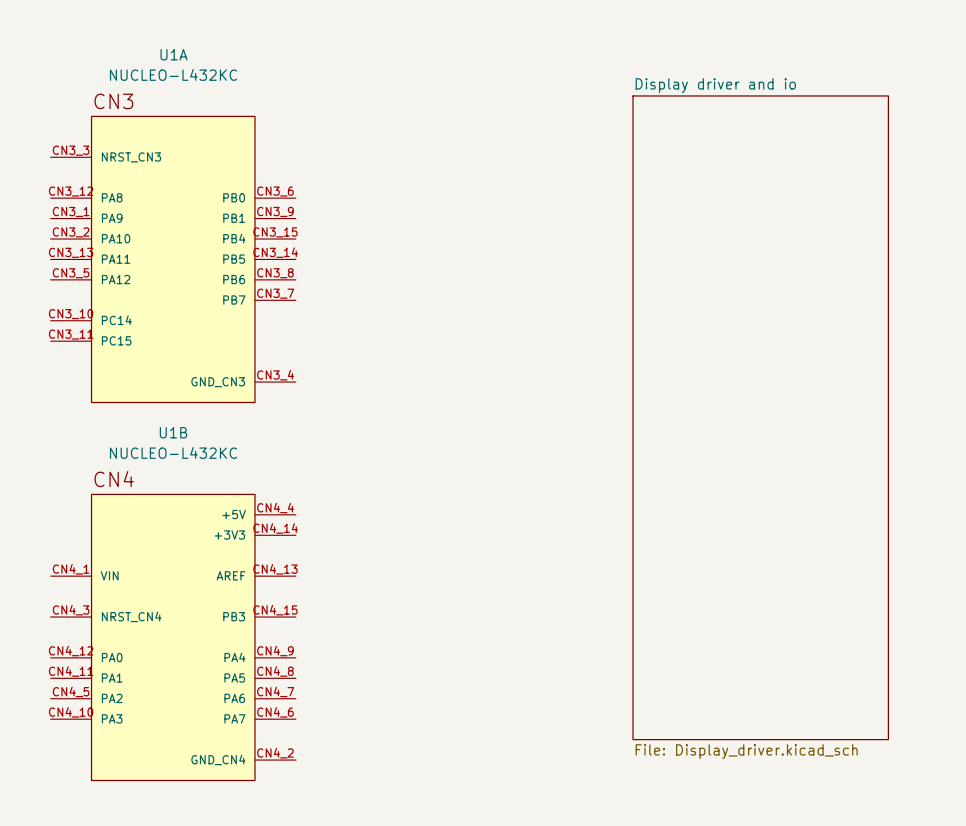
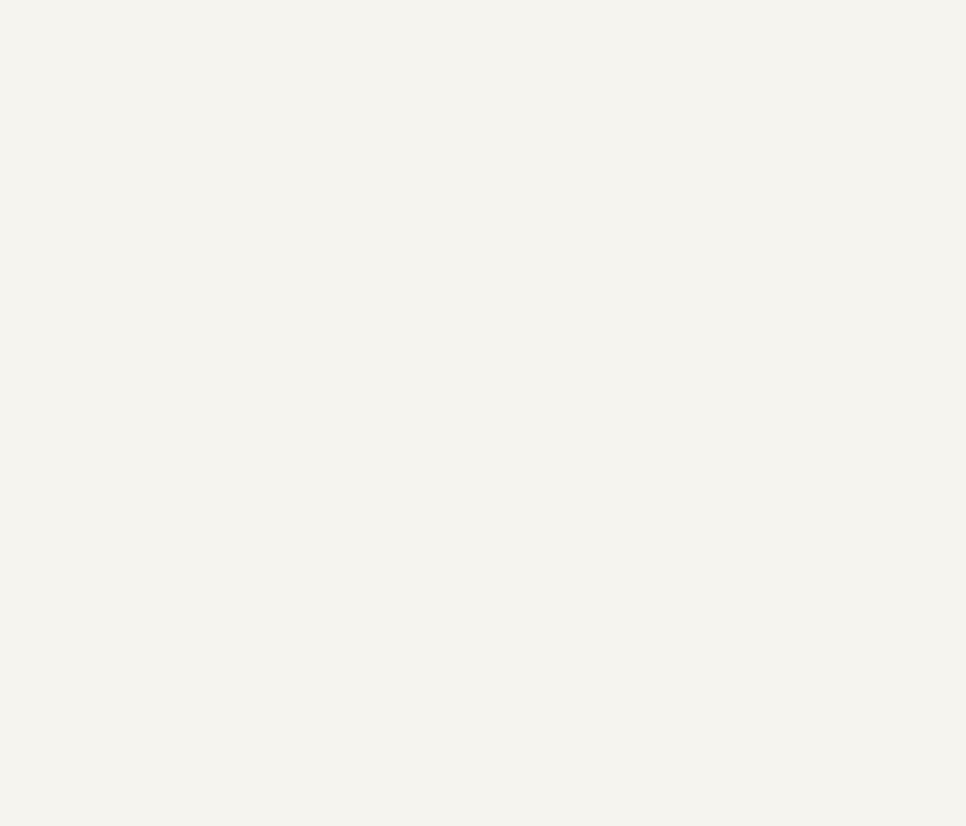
U1A: NUCLEO-L432KC (173, 259) -> none
sheet Display driver and io: File: Display_driver.kicad_sch (760, 417) -> none
U1B: NUCLEO-L432KC (173, 637) -> none

